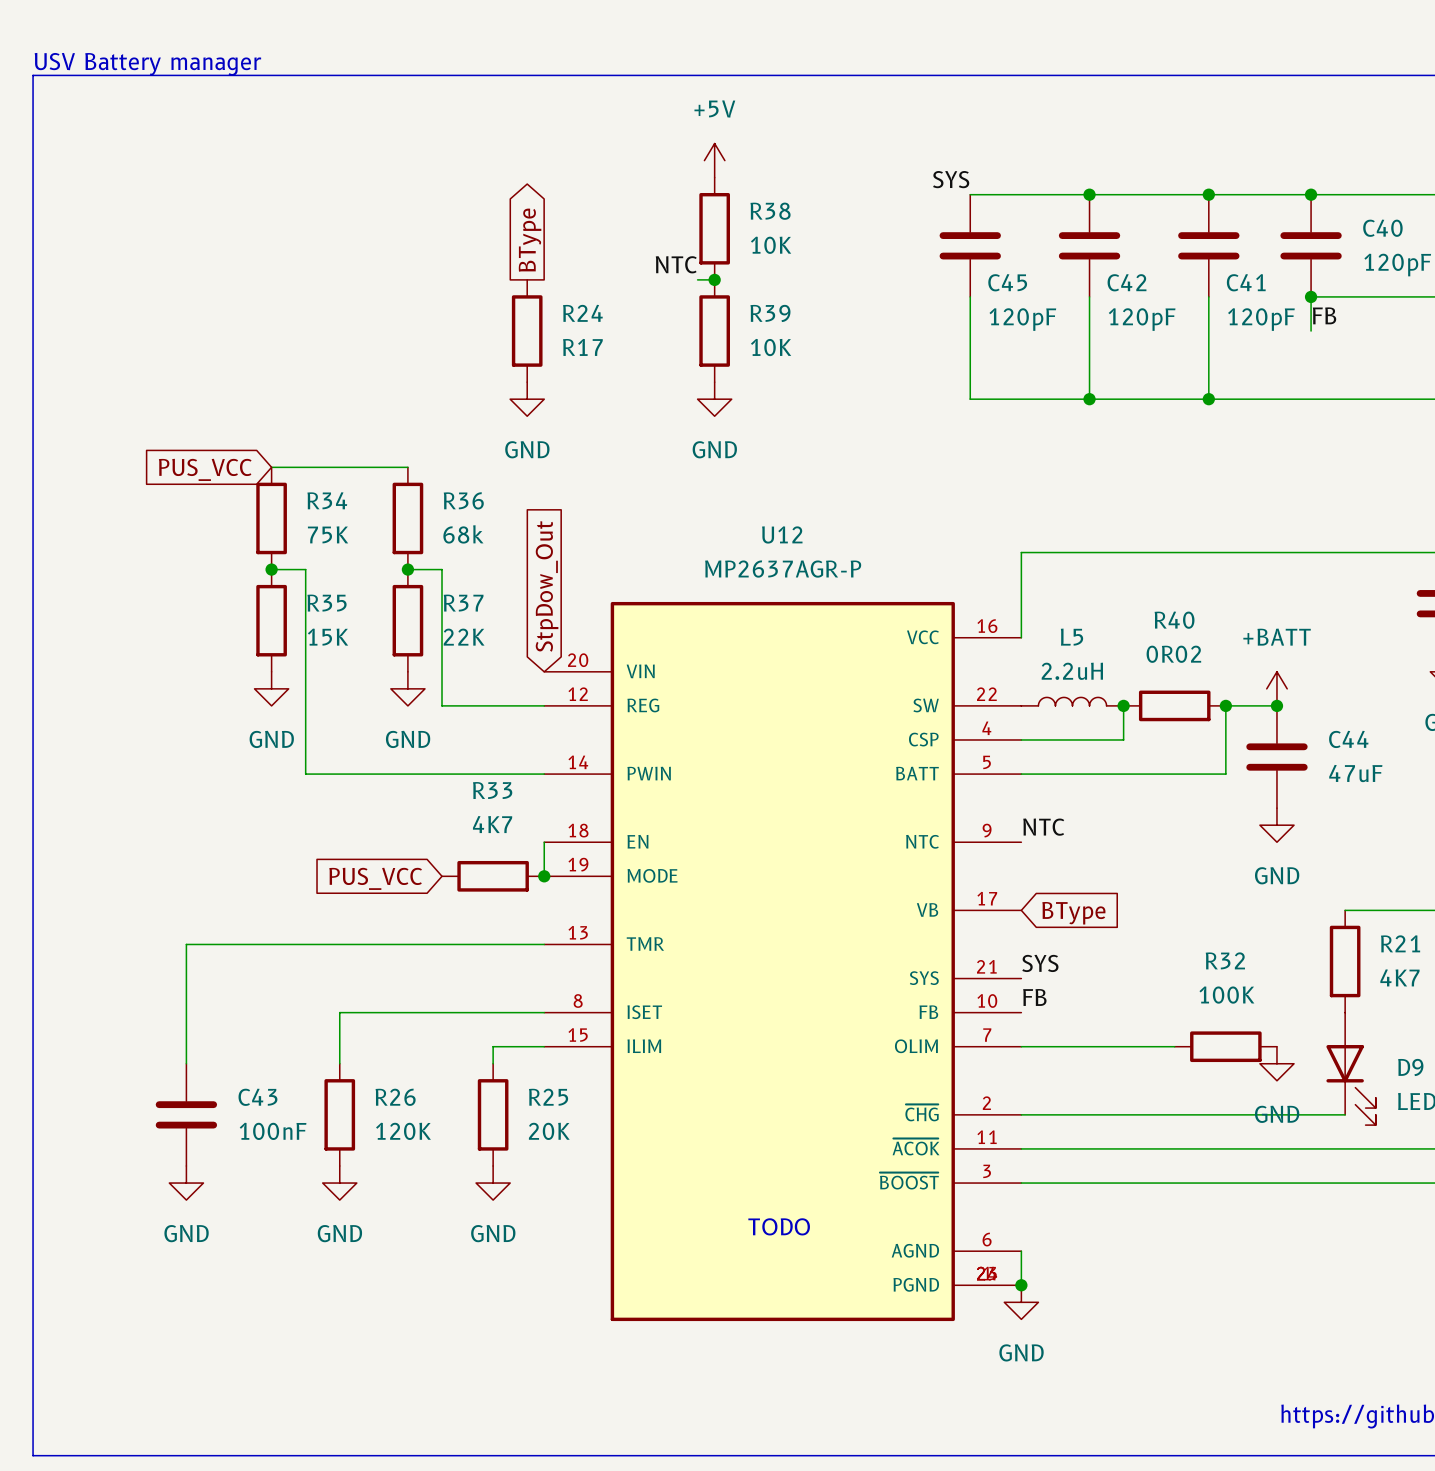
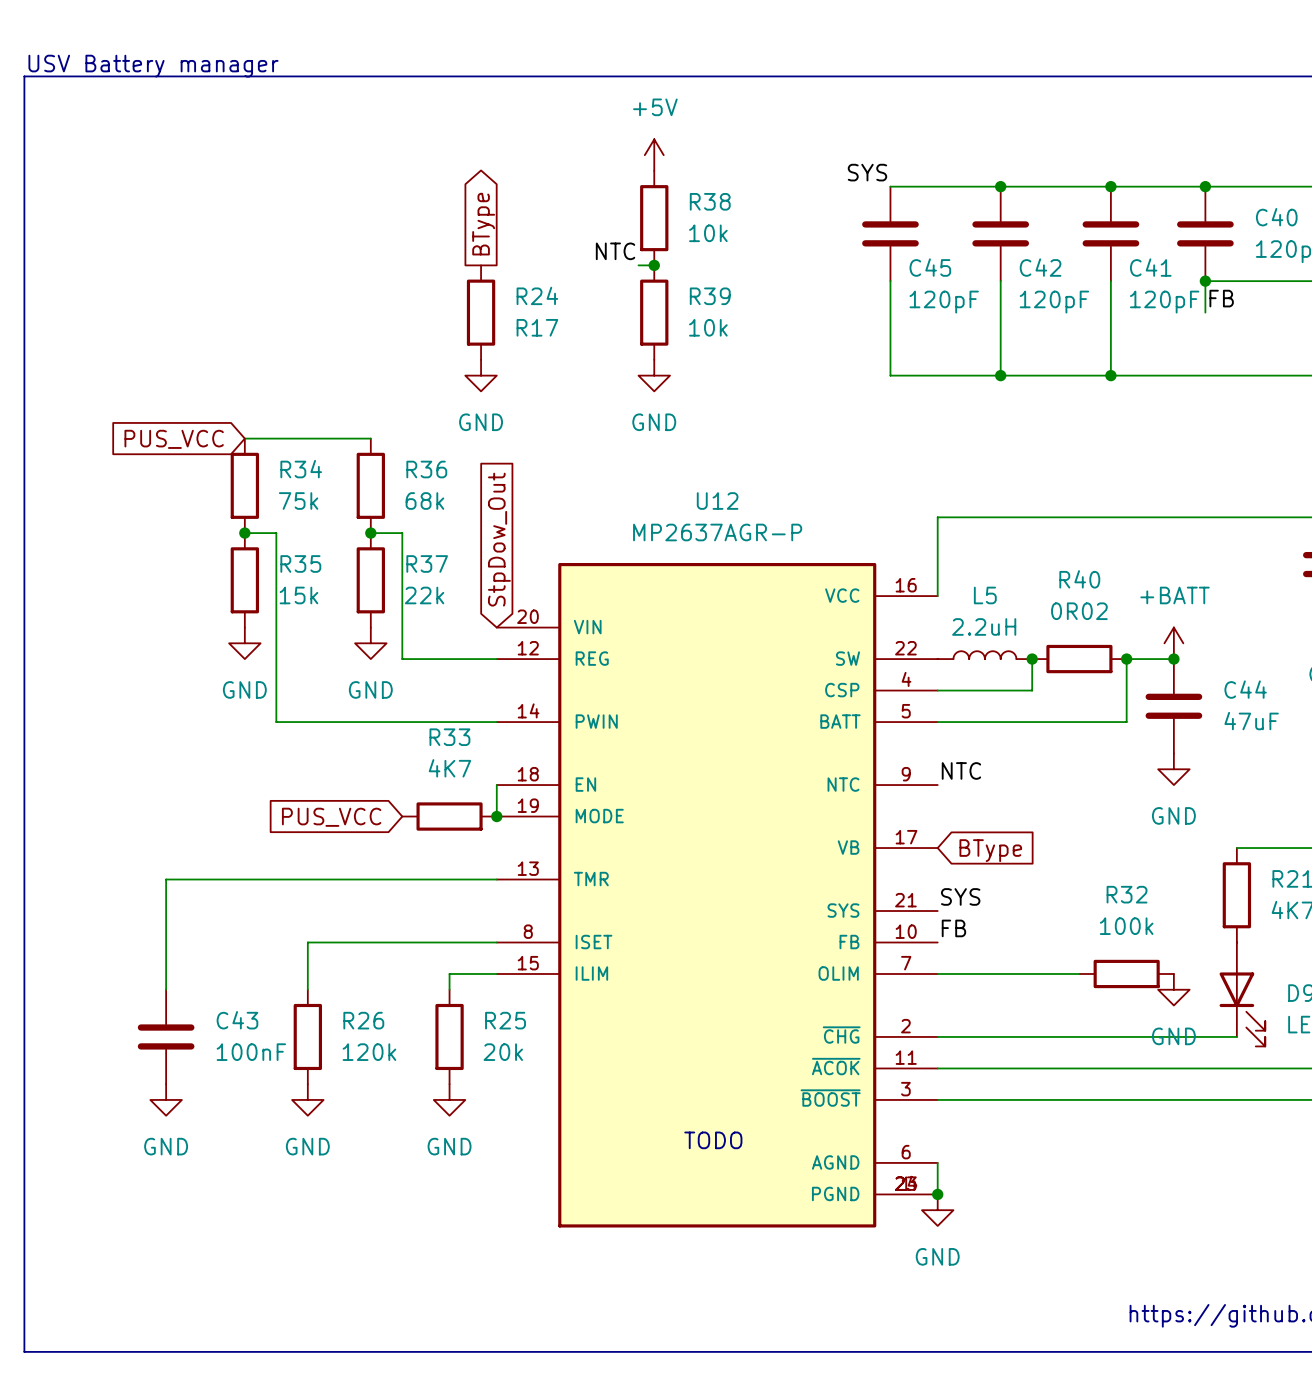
R38 value: 10K (771, 245) -> 10k (708, 233)
R39 value: 10K (771, 347) -> 10k (708, 327)
R34 value: 75K (328, 534) -> 75k (298, 501)
R35 value: 15K (328, 637) -> 15k (298, 595)
R37 value: 22K (464, 637) -> 22k (424, 595)
R32 value: 100K (1226, 995) -> 100k (1126, 926)
R26 value: 120K (403, 1131) -> 120k (369, 1052)
R25 value: 20K (549, 1131) -> 20k (503, 1052)

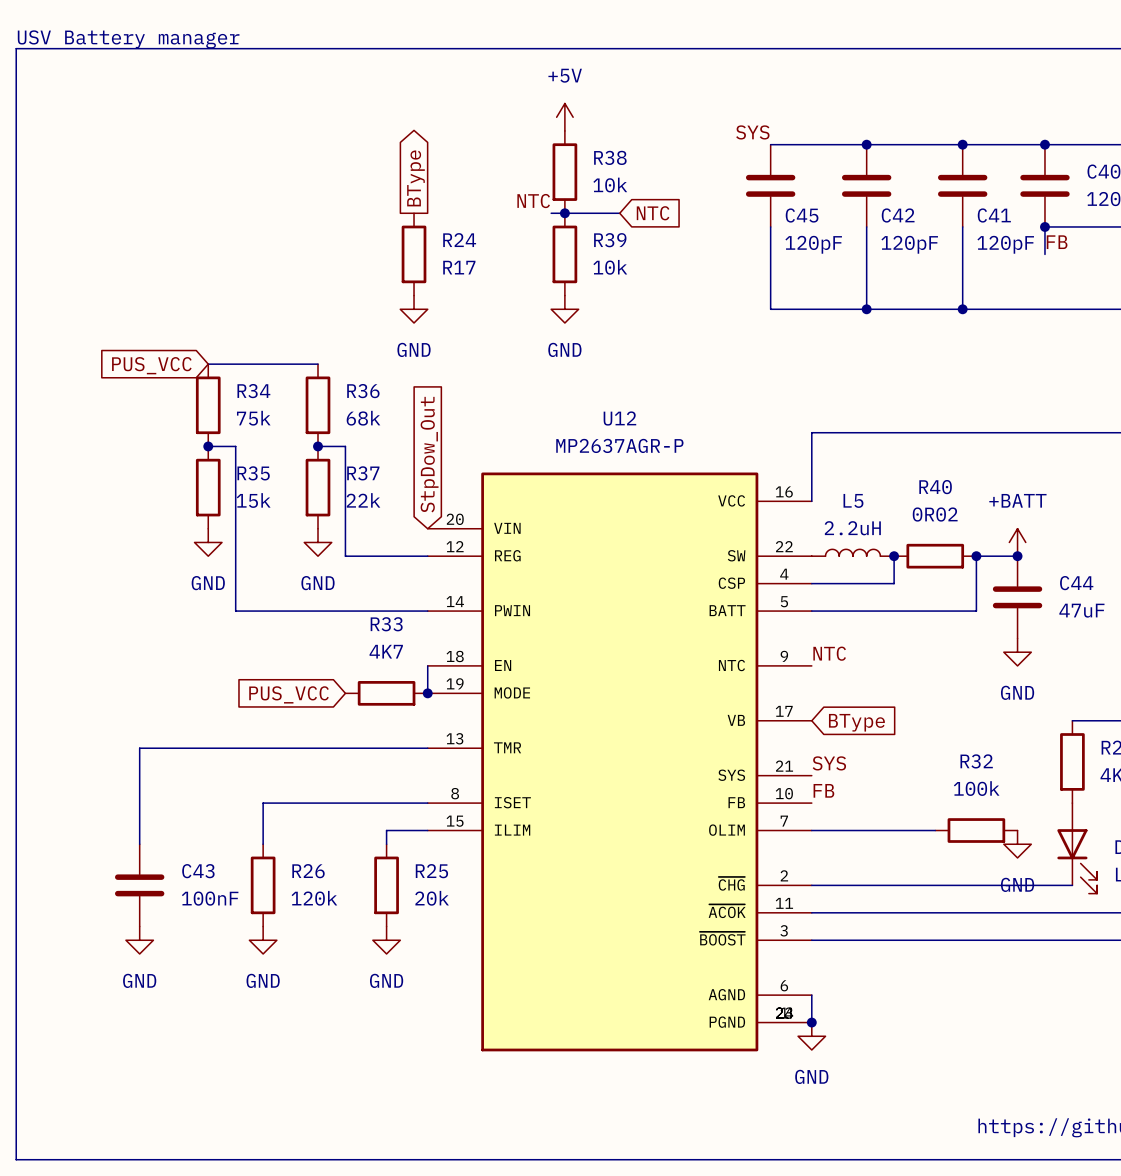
wire: none -> (564, 213) (619, 213)
global label: none -> NTC (653, 213)
text: TODO (713, 1140) -> none

